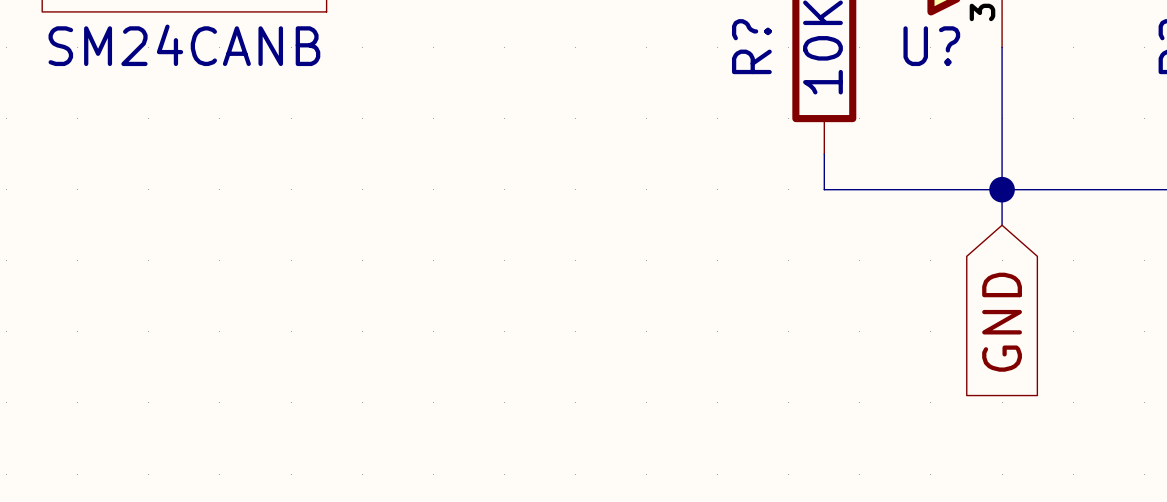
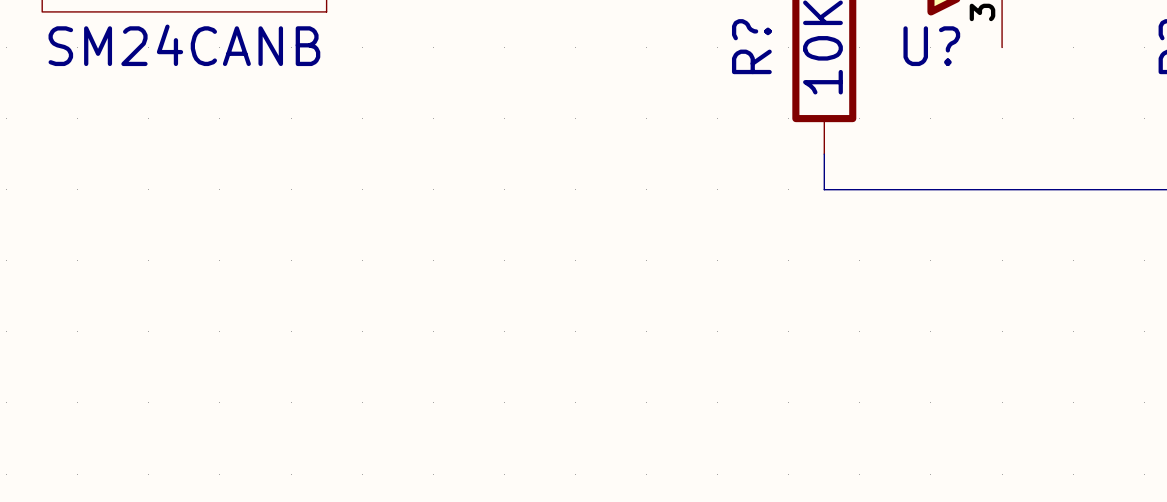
wire: (1002, 47) (1002, 225) -> none
junction: (1002, 189) -> none
global label: GND (1002, 322) -> none

